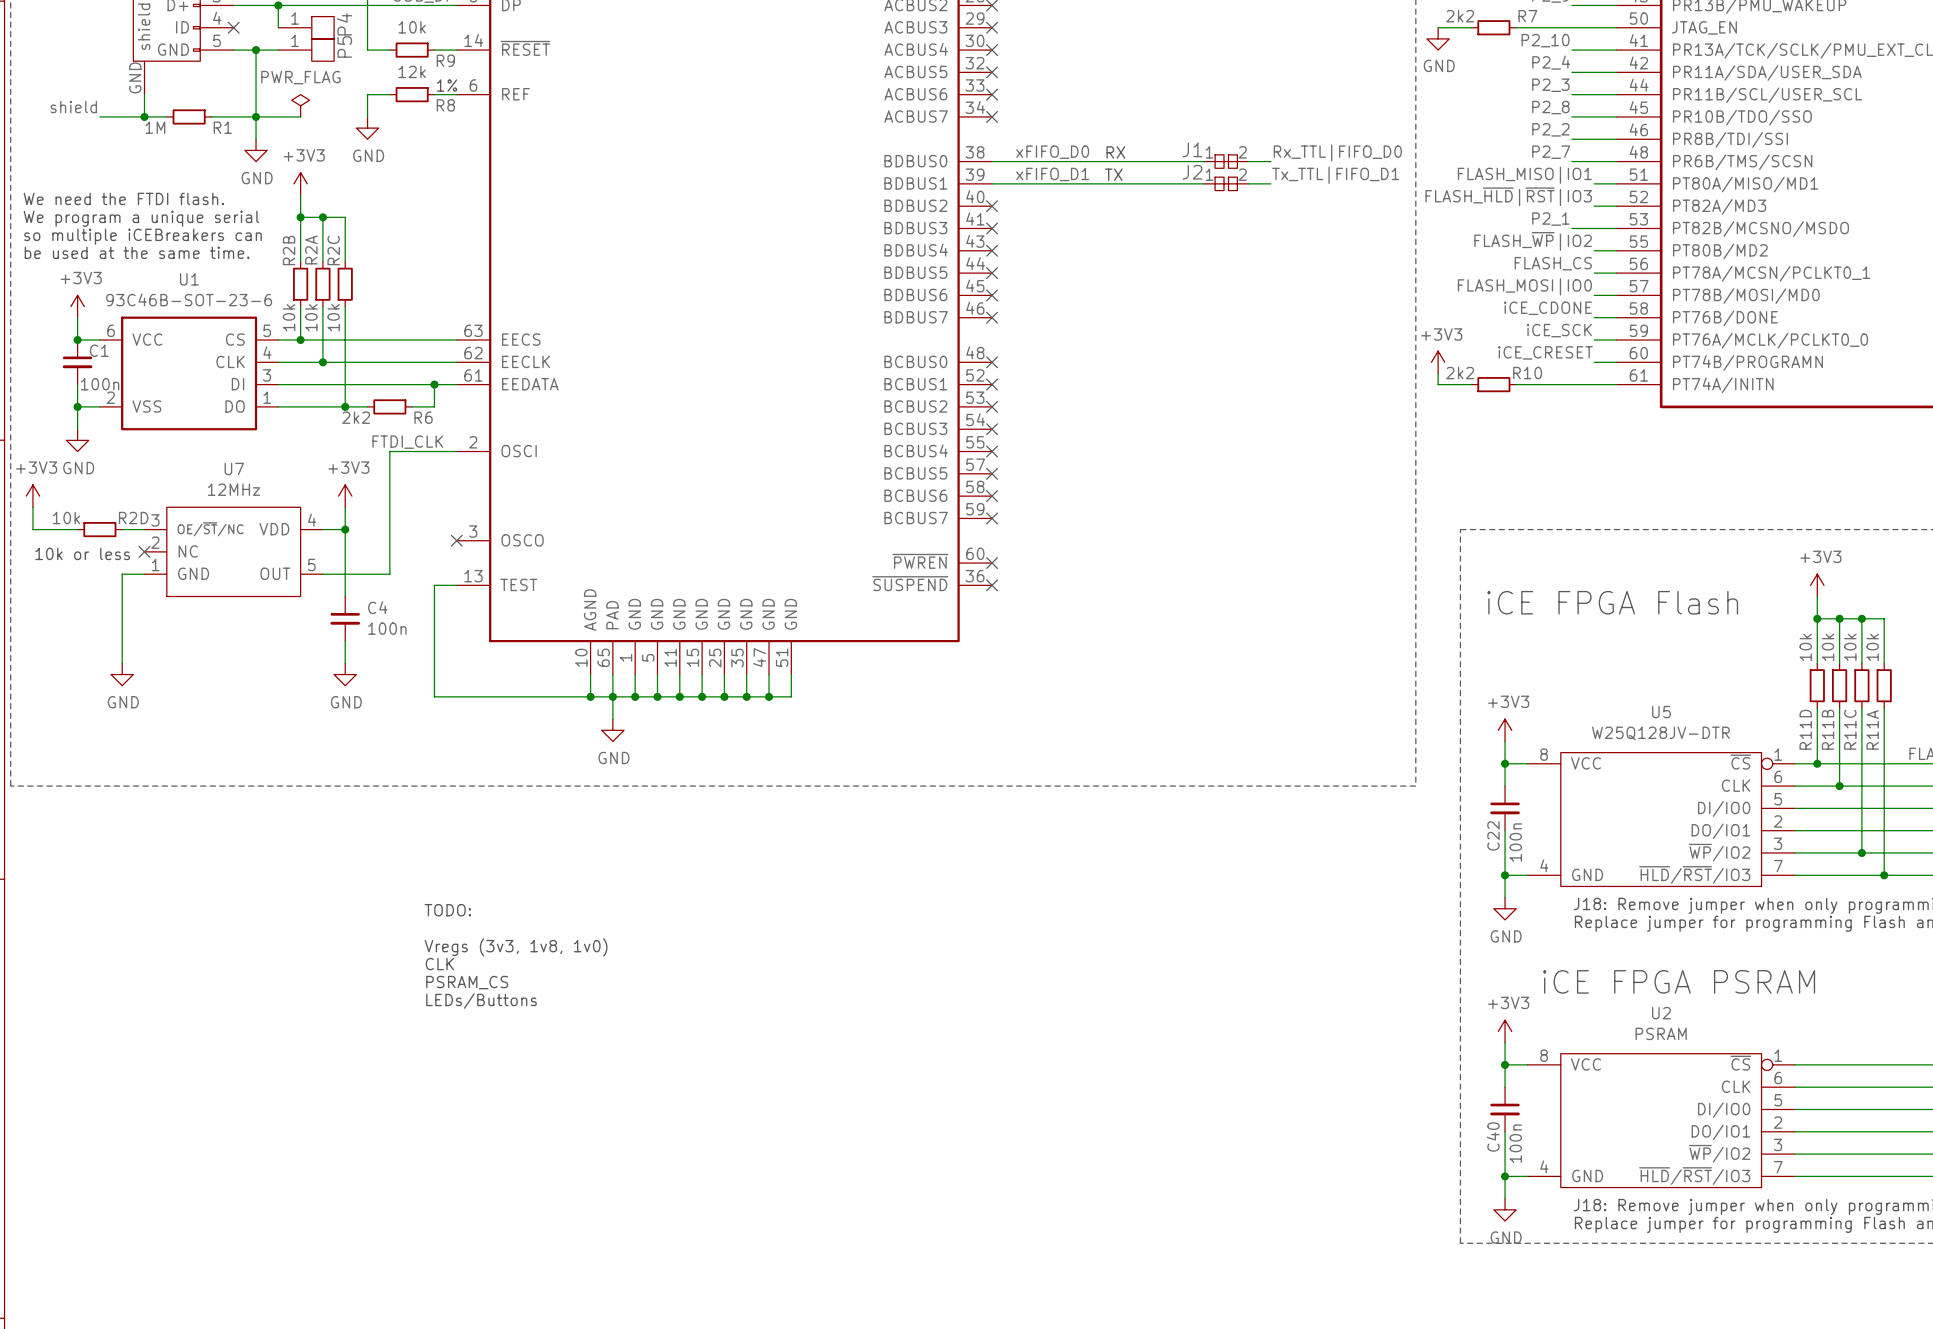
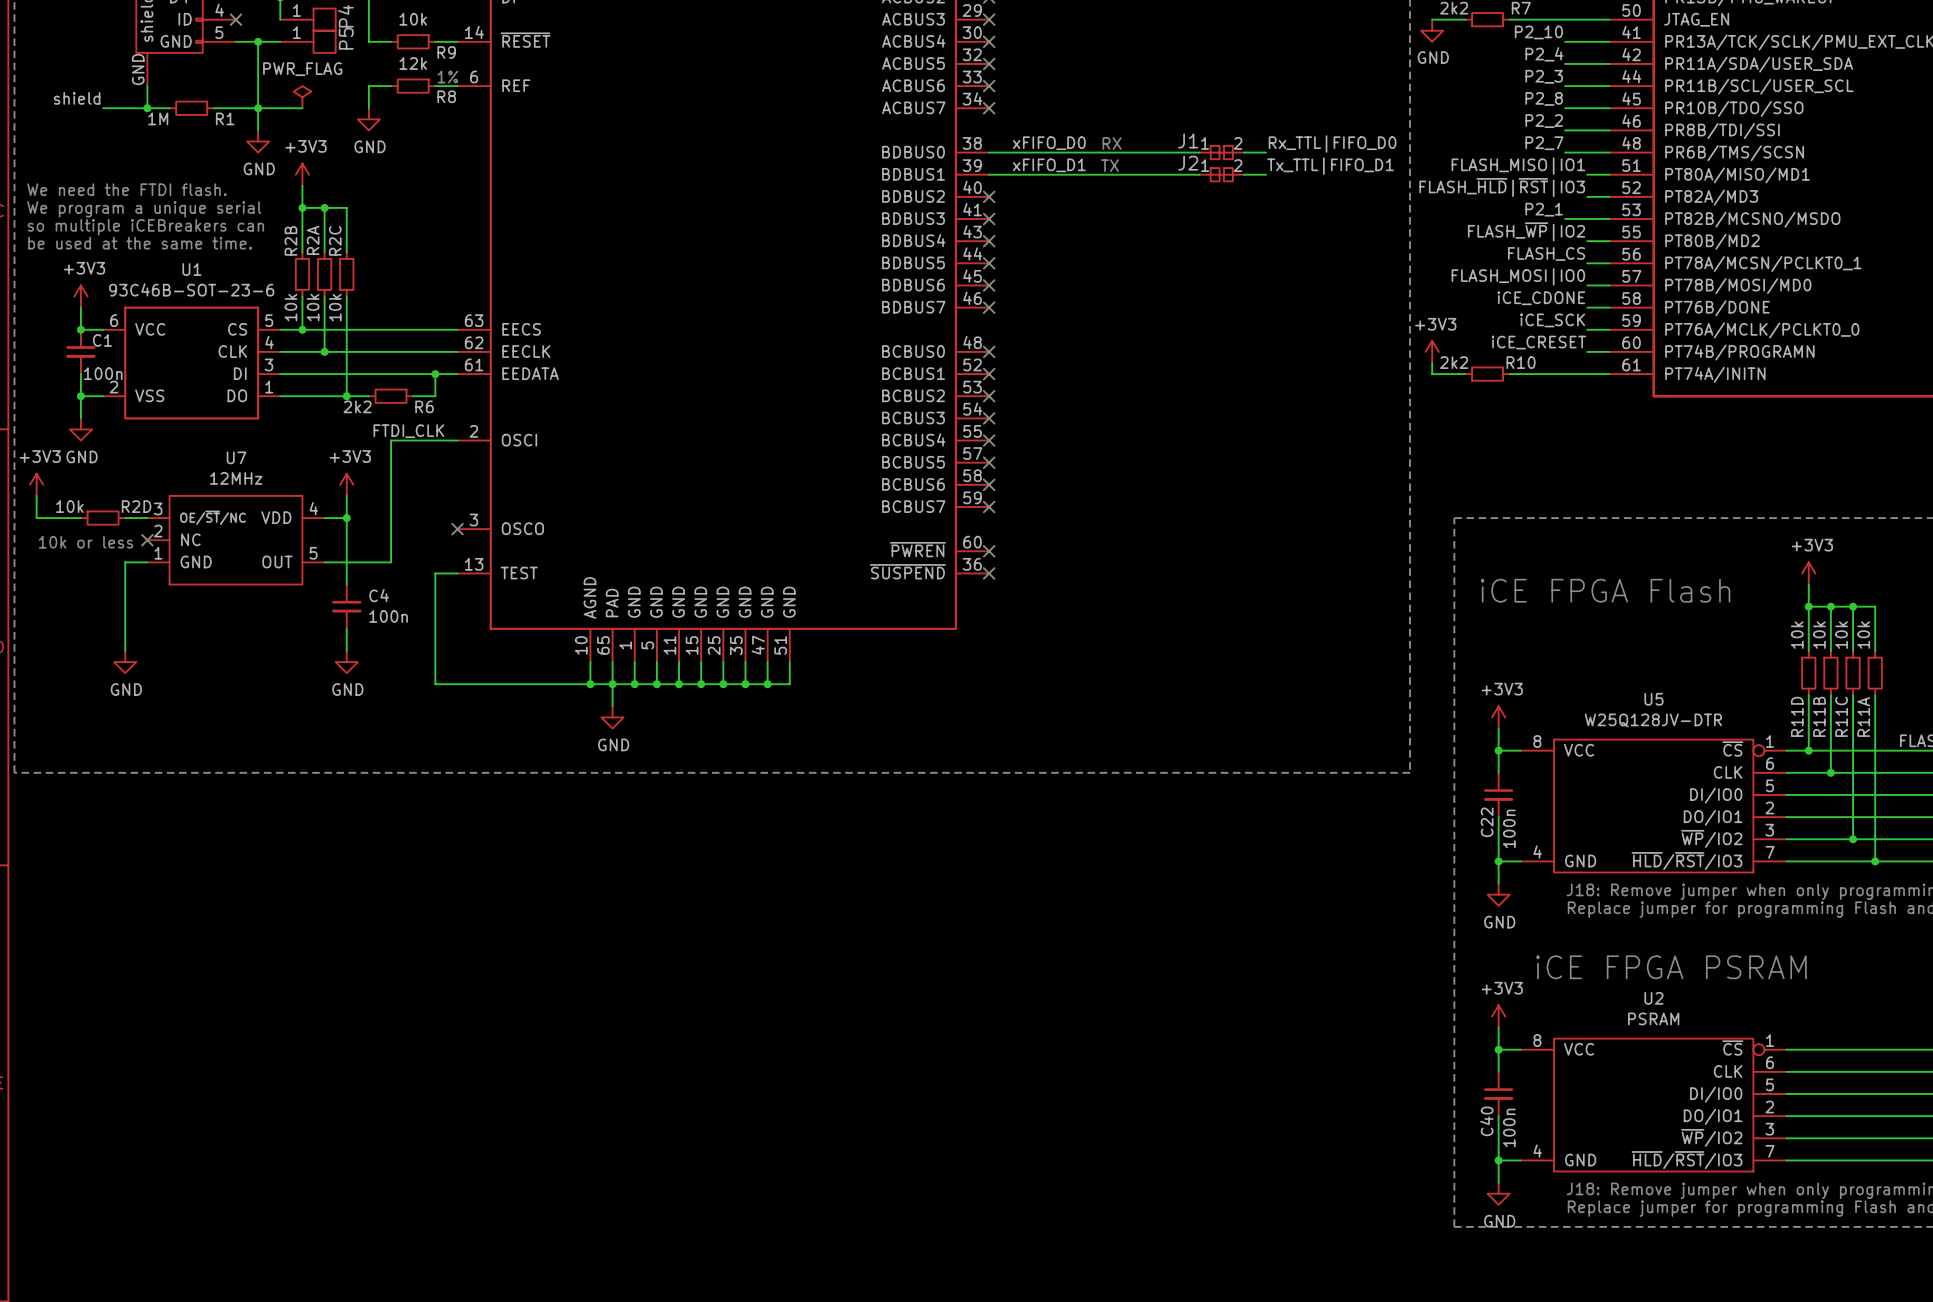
text: TODO: (447, 910) -> none
text: Vregs (3v3, 1v8, 1v0) (516, 947) -> none
text: CLK (439, 964) -> none
text: PSRAM_CS (467, 982) -> none
text: LEDs/Buttons (481, 1001) -> none

